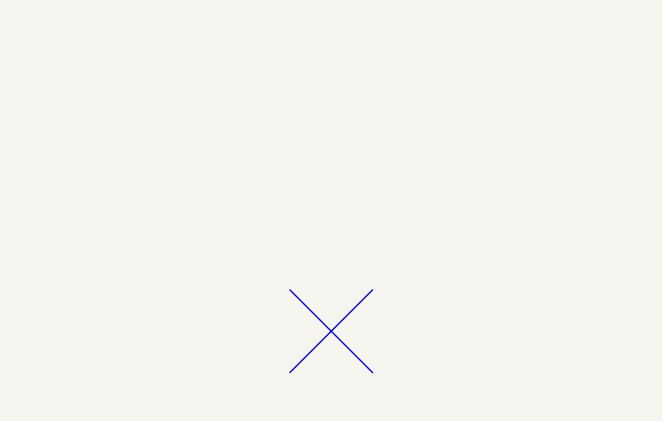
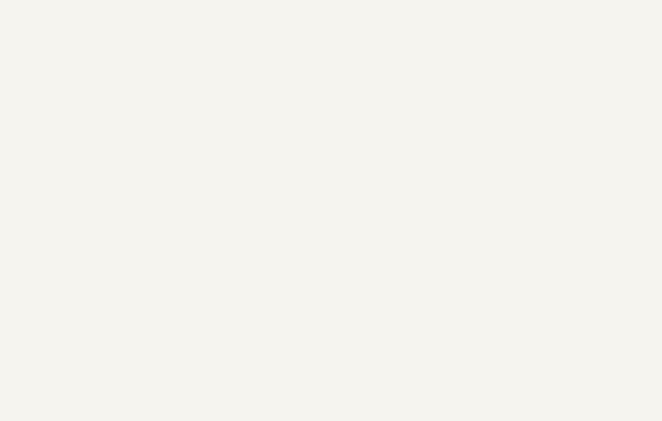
no-connect mark: (331, 331) -> none

